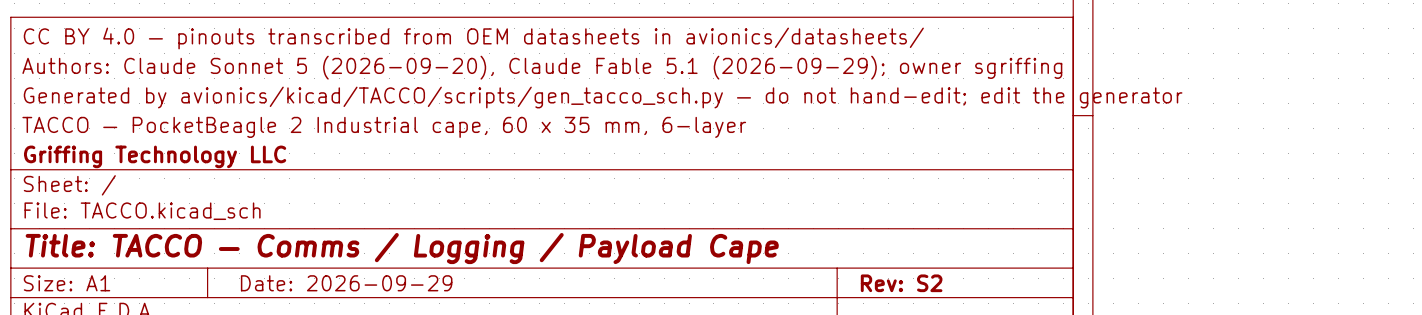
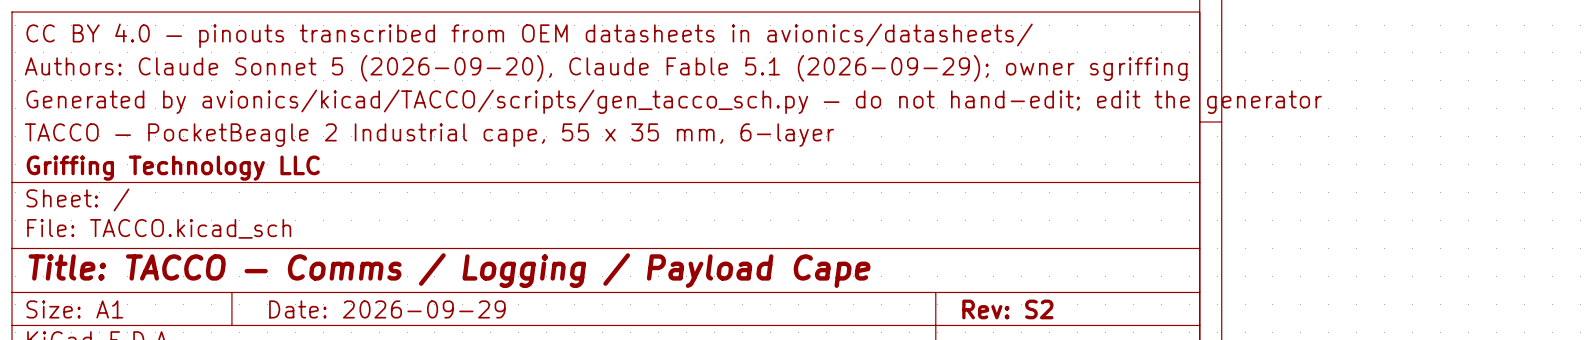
title block: TACCO — PocketBeagle 2 Industrial cape, 60 x 35 mm, 6-layer (384, 127) -> TACCO — PocketBeagle 2 Industrial cape, 55 x 35 mm, 6-layer (429, 135)

